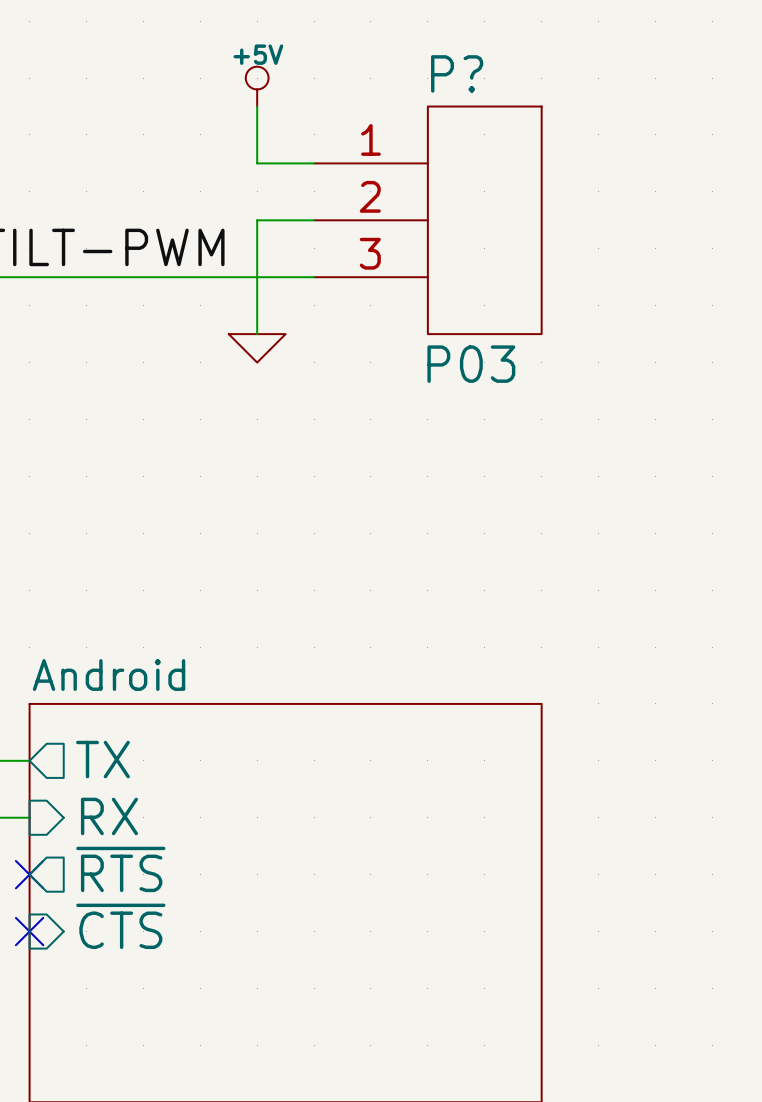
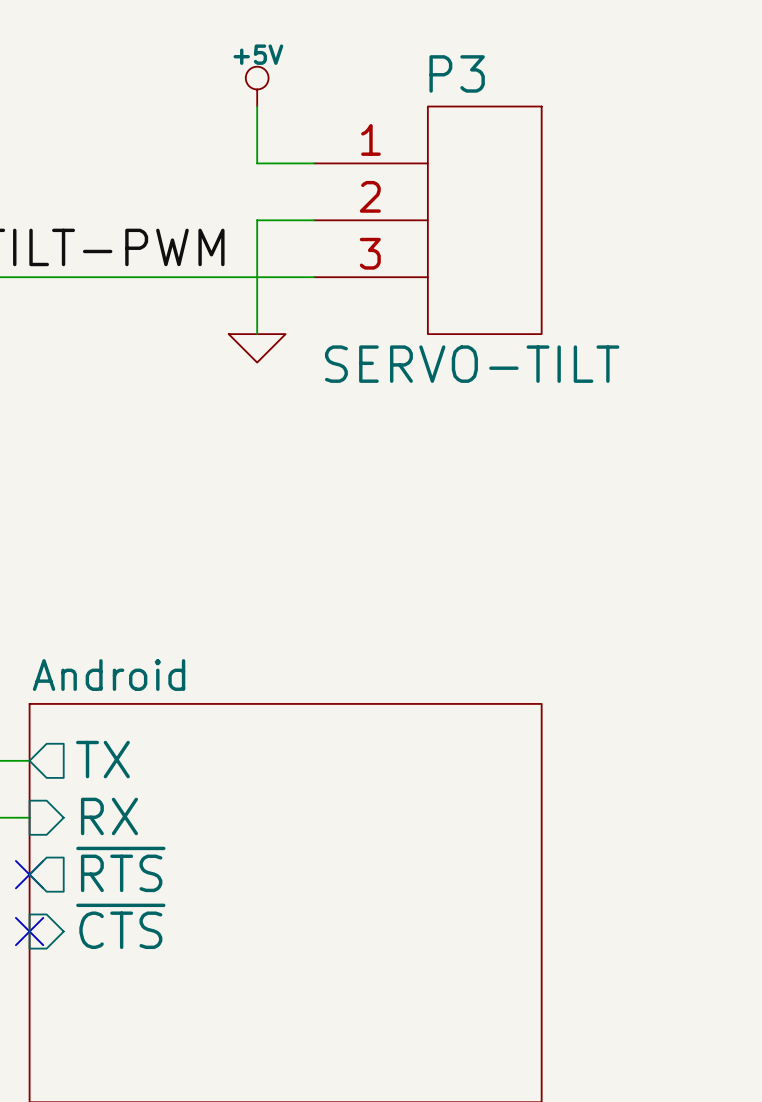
P? name: P? (457, 73) -> P3 (457, 73)
P? value: P03 (471, 364) -> SERVO-TILT (472, 364)

